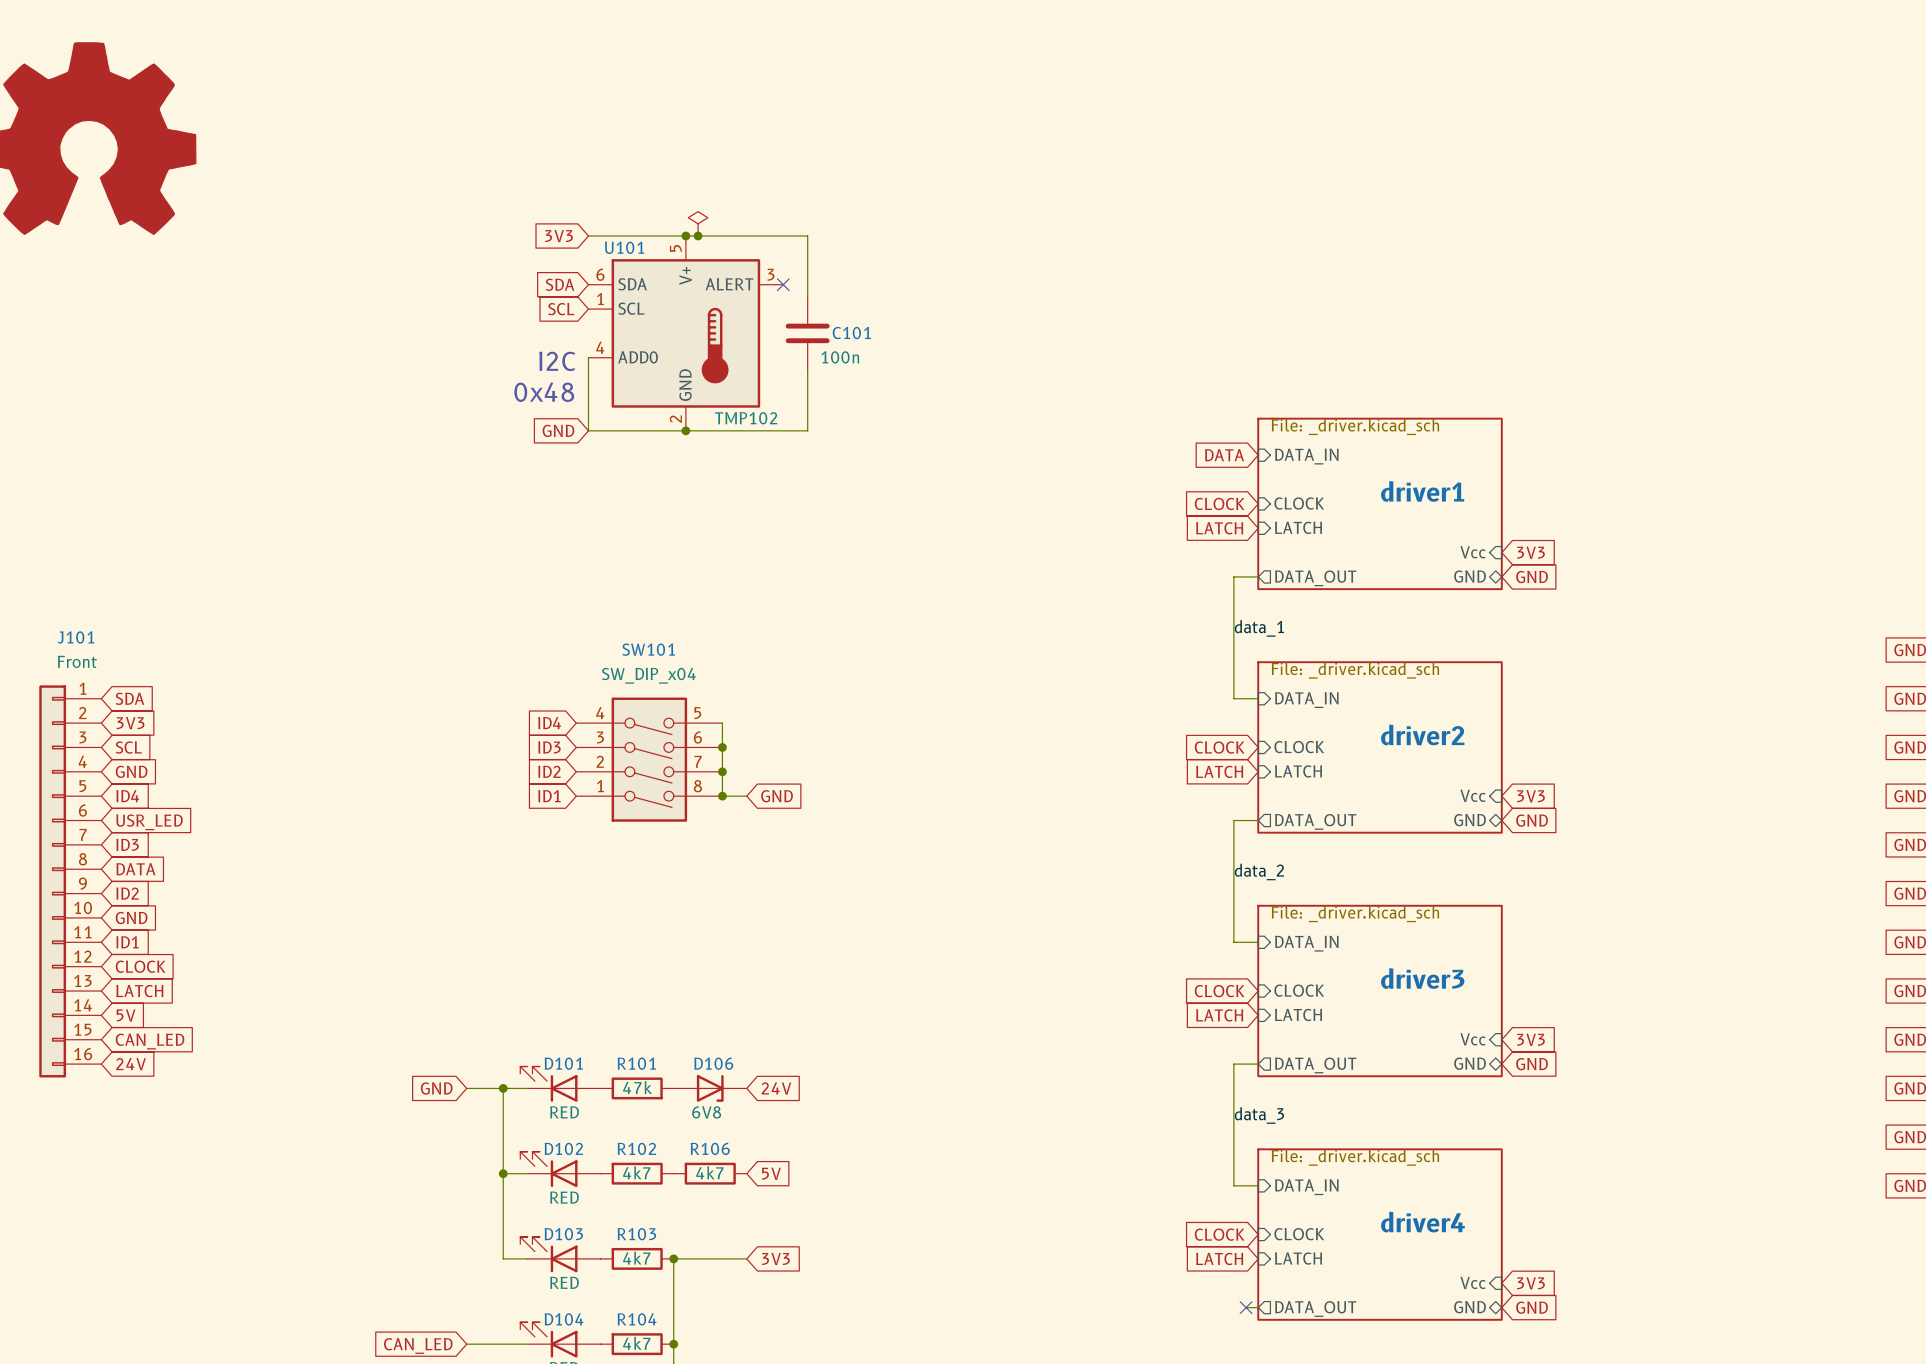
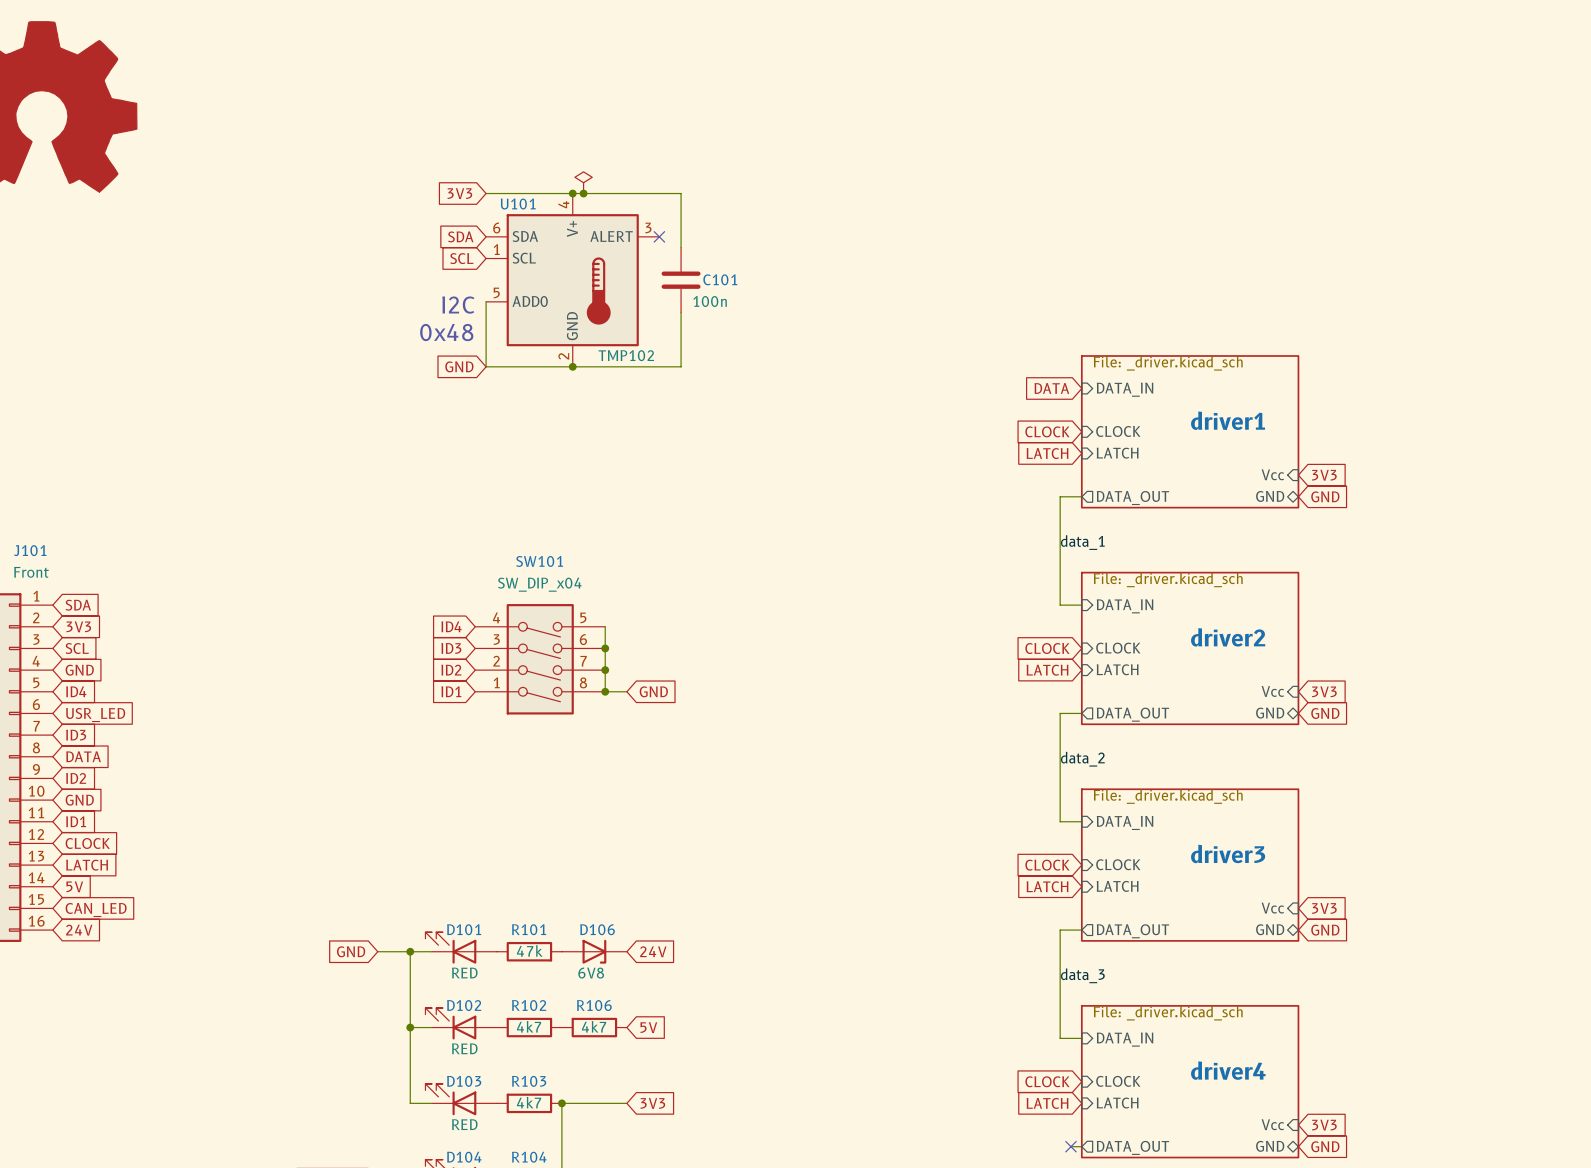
U101 pin number: 5 (675, 248) -> 4 (563, 204)
U101 pin number: 4 (600, 347) -> 5 (496, 292)

